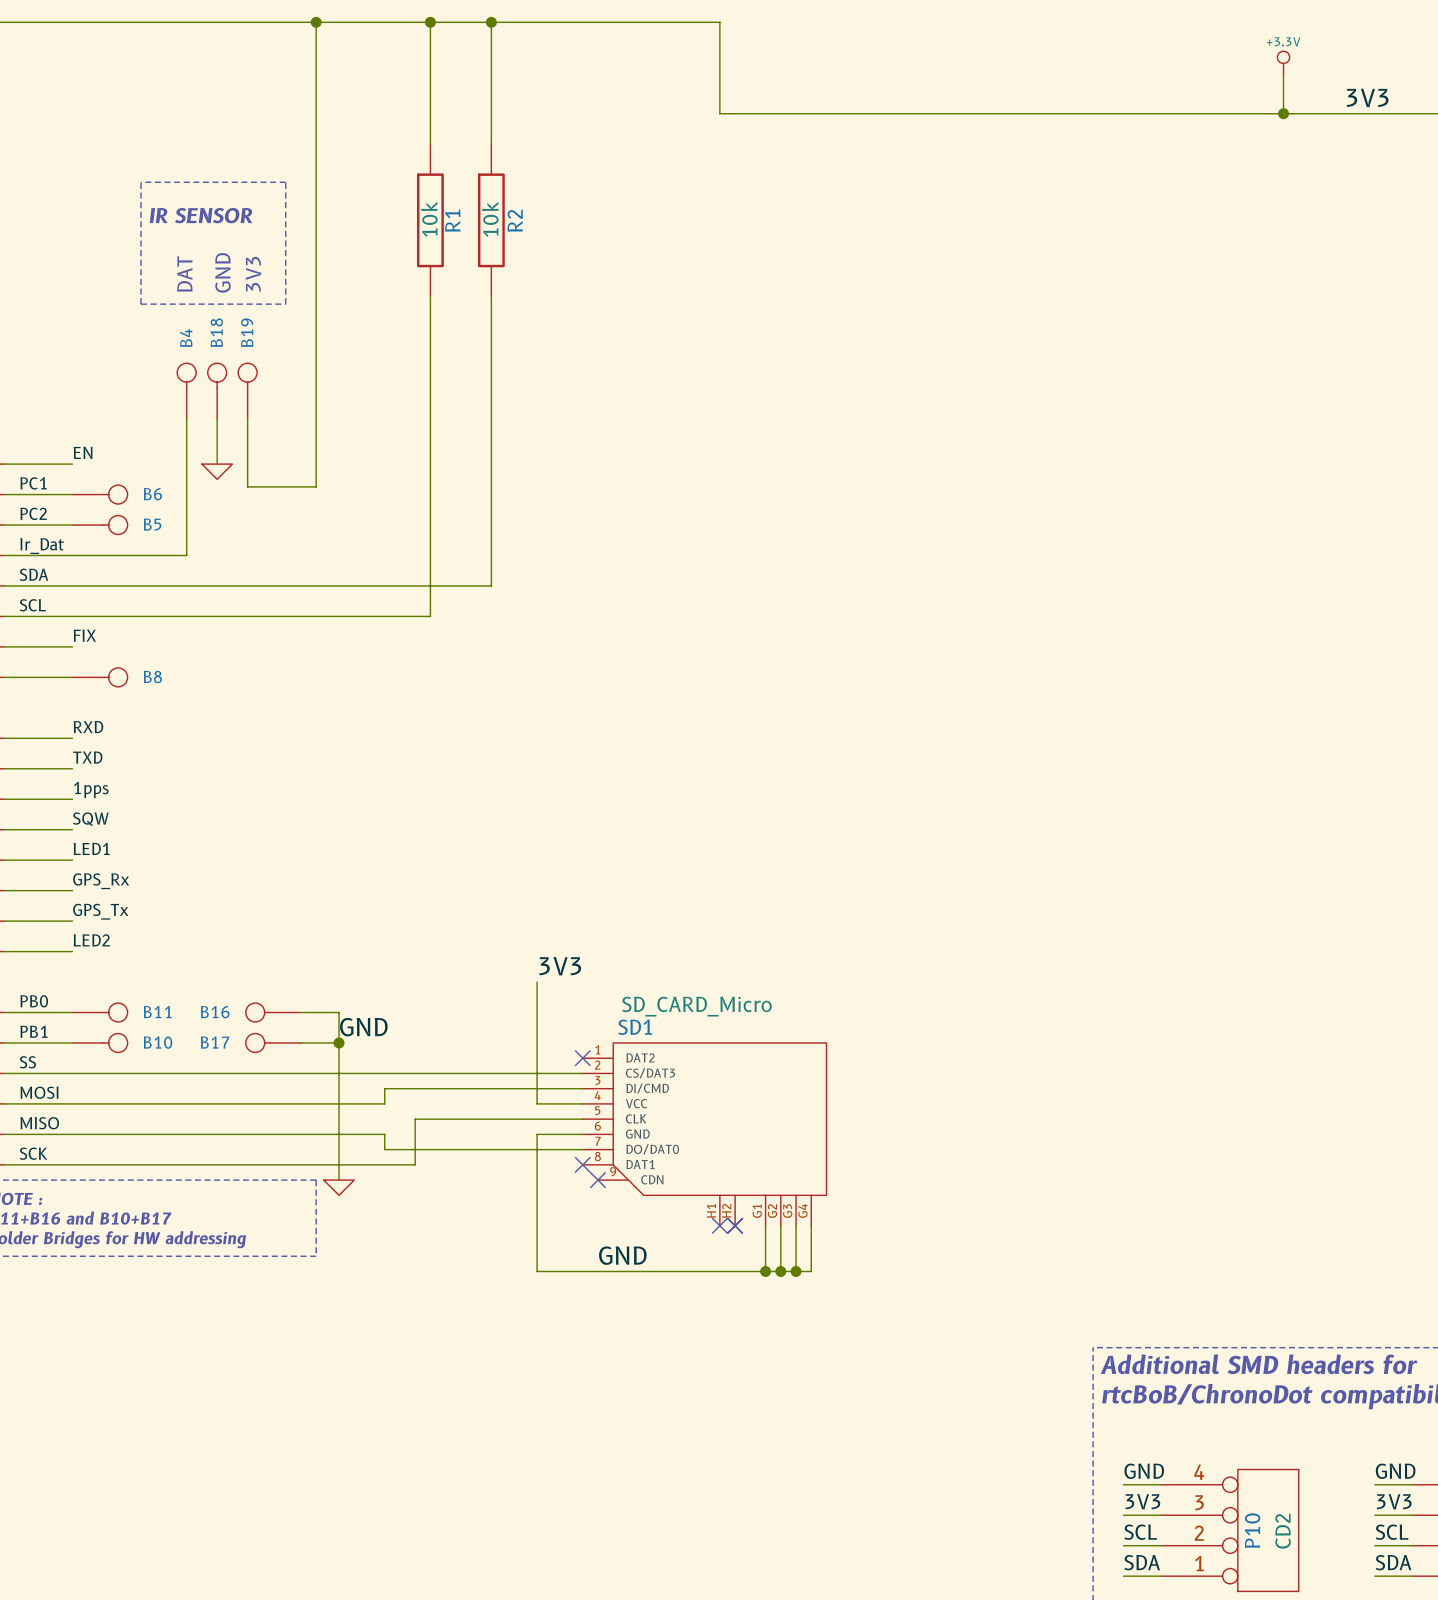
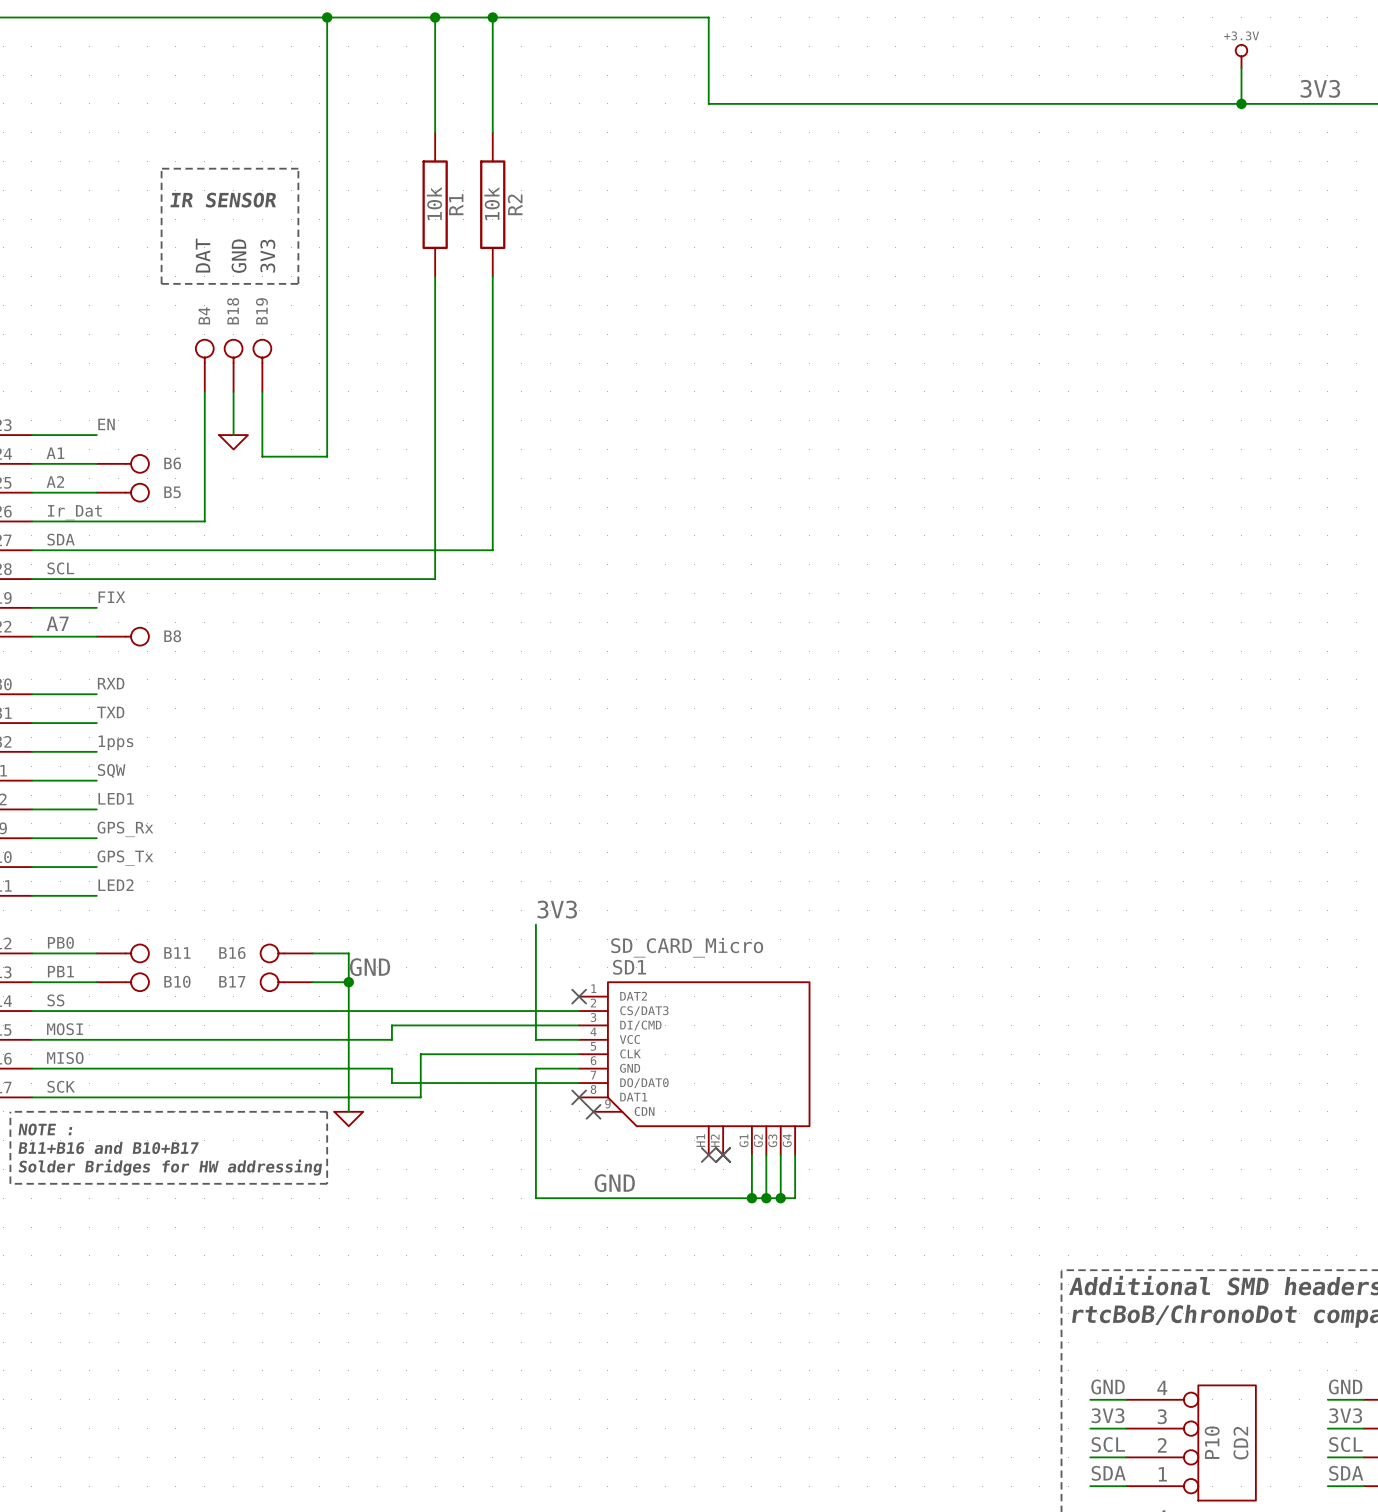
label: PC1 (33, 483) -> A1 (55, 453)
label: PC2 (33, 513) -> A2 (55, 481)
label: none -> A7 (57, 623)

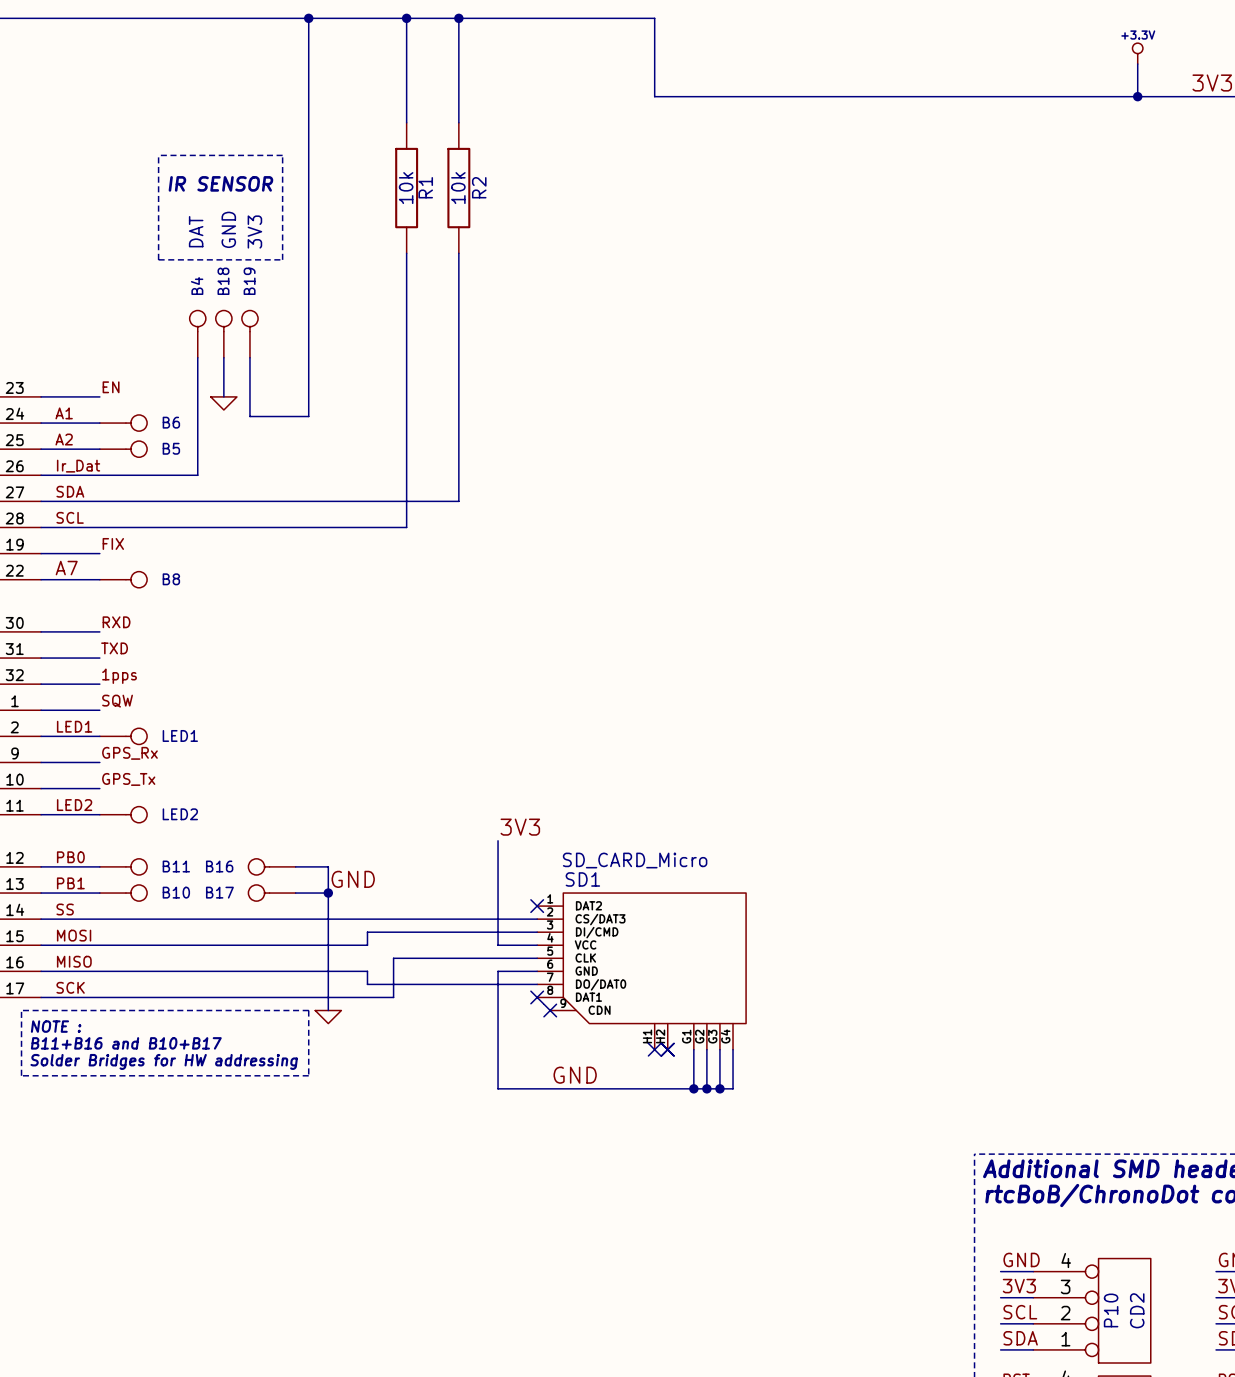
label position: LED1 (116, 798) -> LED1 (74, 726)
LED1: none -> (123, 736)
label position: LED2 (115, 885) -> LED2 (74, 805)
LED2: none -> (123, 814)

